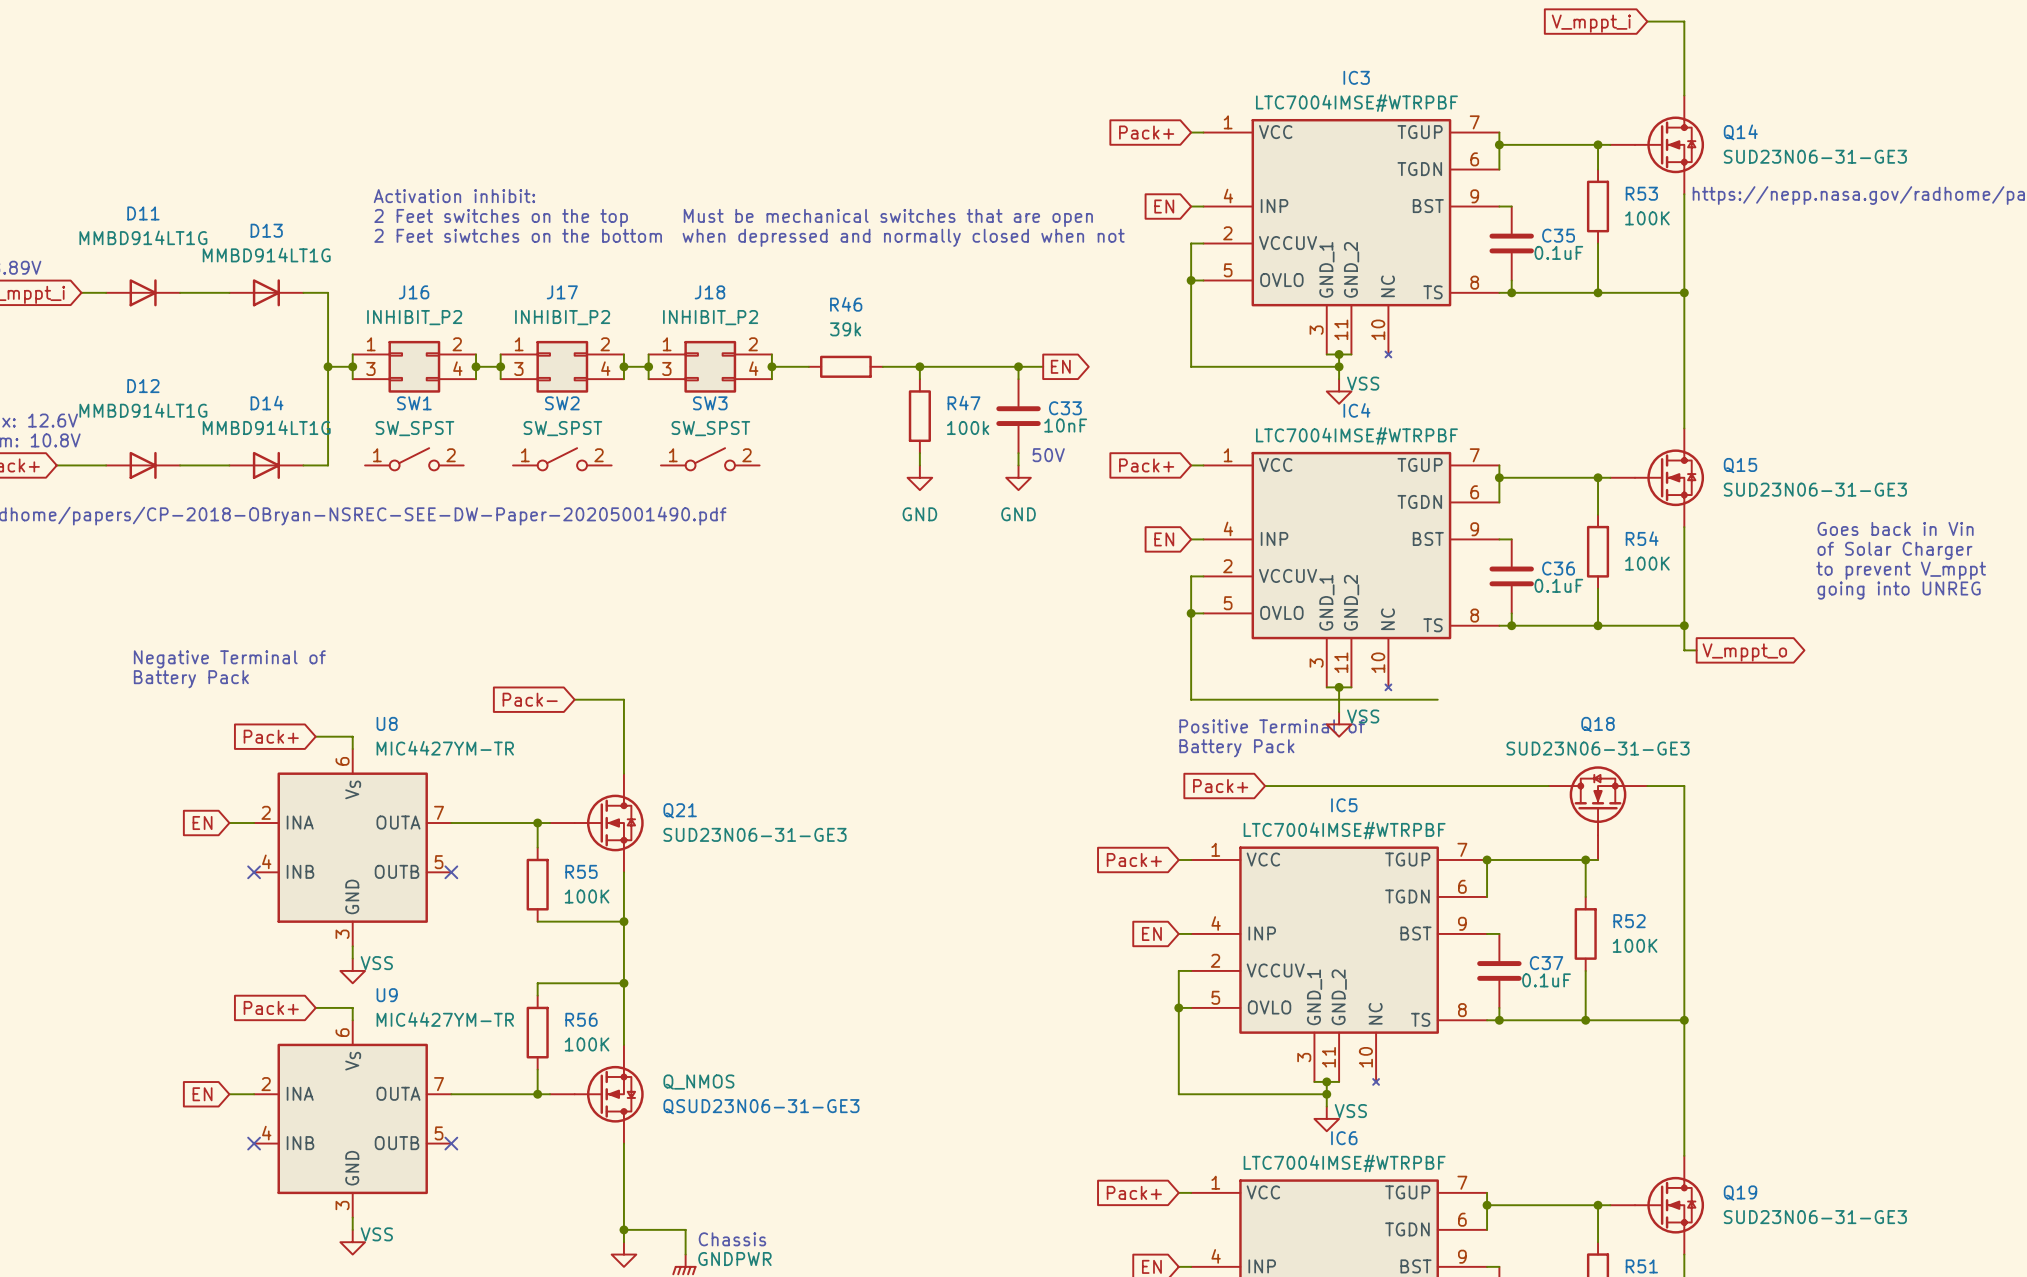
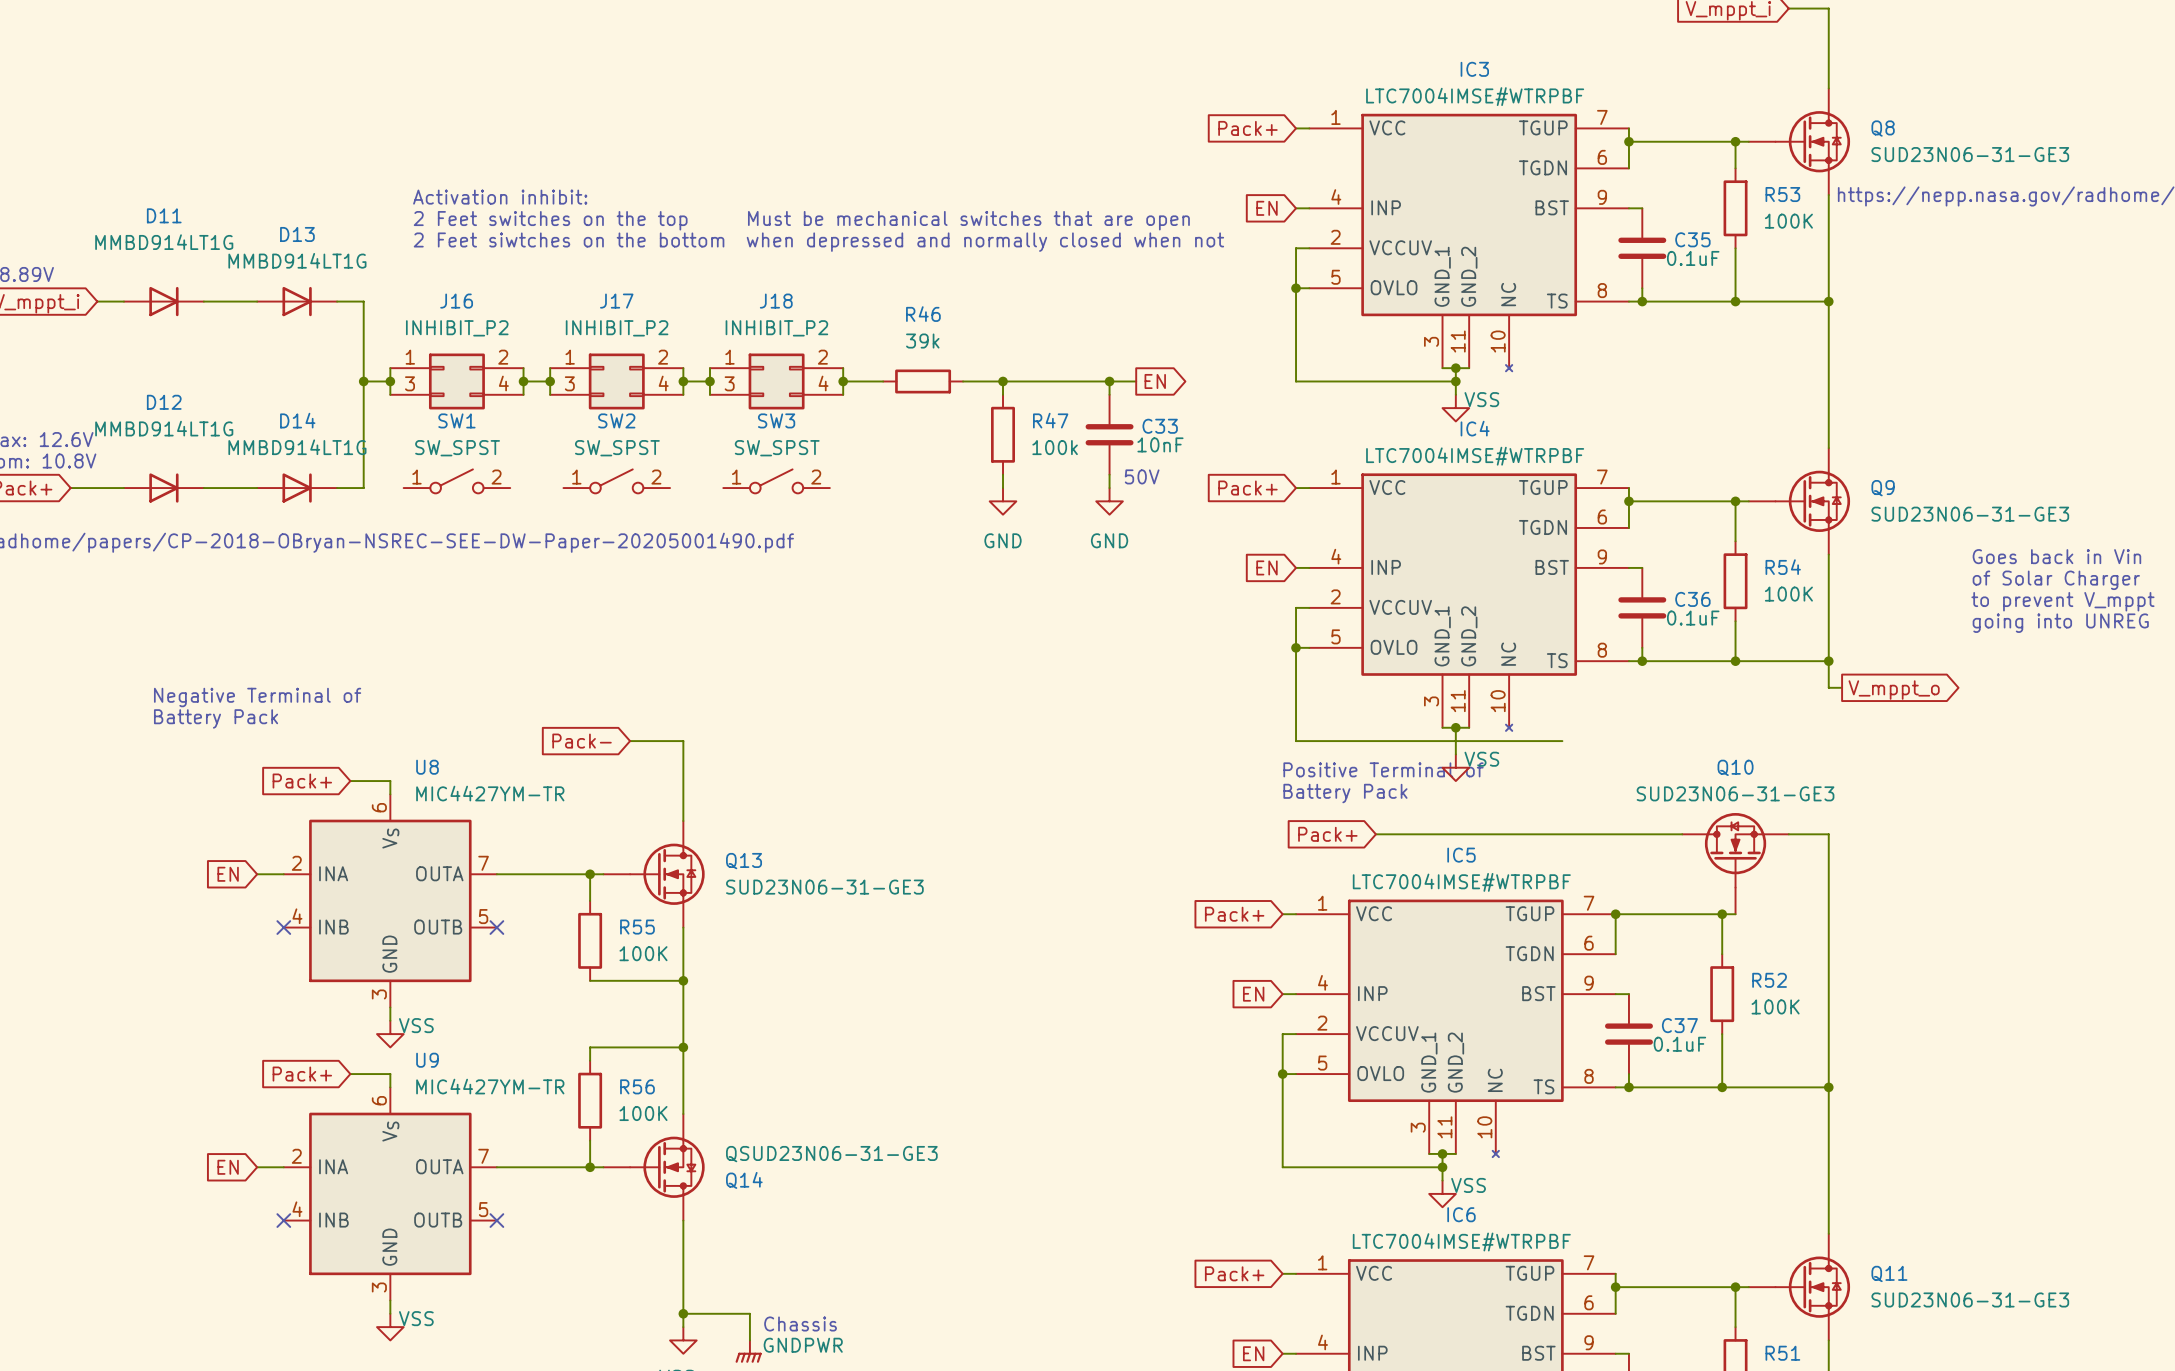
Q14 name: Q14 (1740, 132) -> Q8 (1883, 128)
Q15 name: Q15 (1740, 465) -> Q9 (1883, 488)
Q18 name: Q18 (1598, 724) -> Q10 (1735, 767)
Q21 name: Q21 (680, 810) -> Q13 (744, 861)
QSUD23N06-31-GE3 value: Q_NMOS (698, 1082) -> QSUD23N06-31-GE3 (831, 1154)
QSUD23N06-31-GE3 name: QSUD23N06-31-GE3 (761, 1106) -> Q14 (744, 1180)
Q19 name: Q19 (1740, 1193) -> Q11 (1889, 1273)

